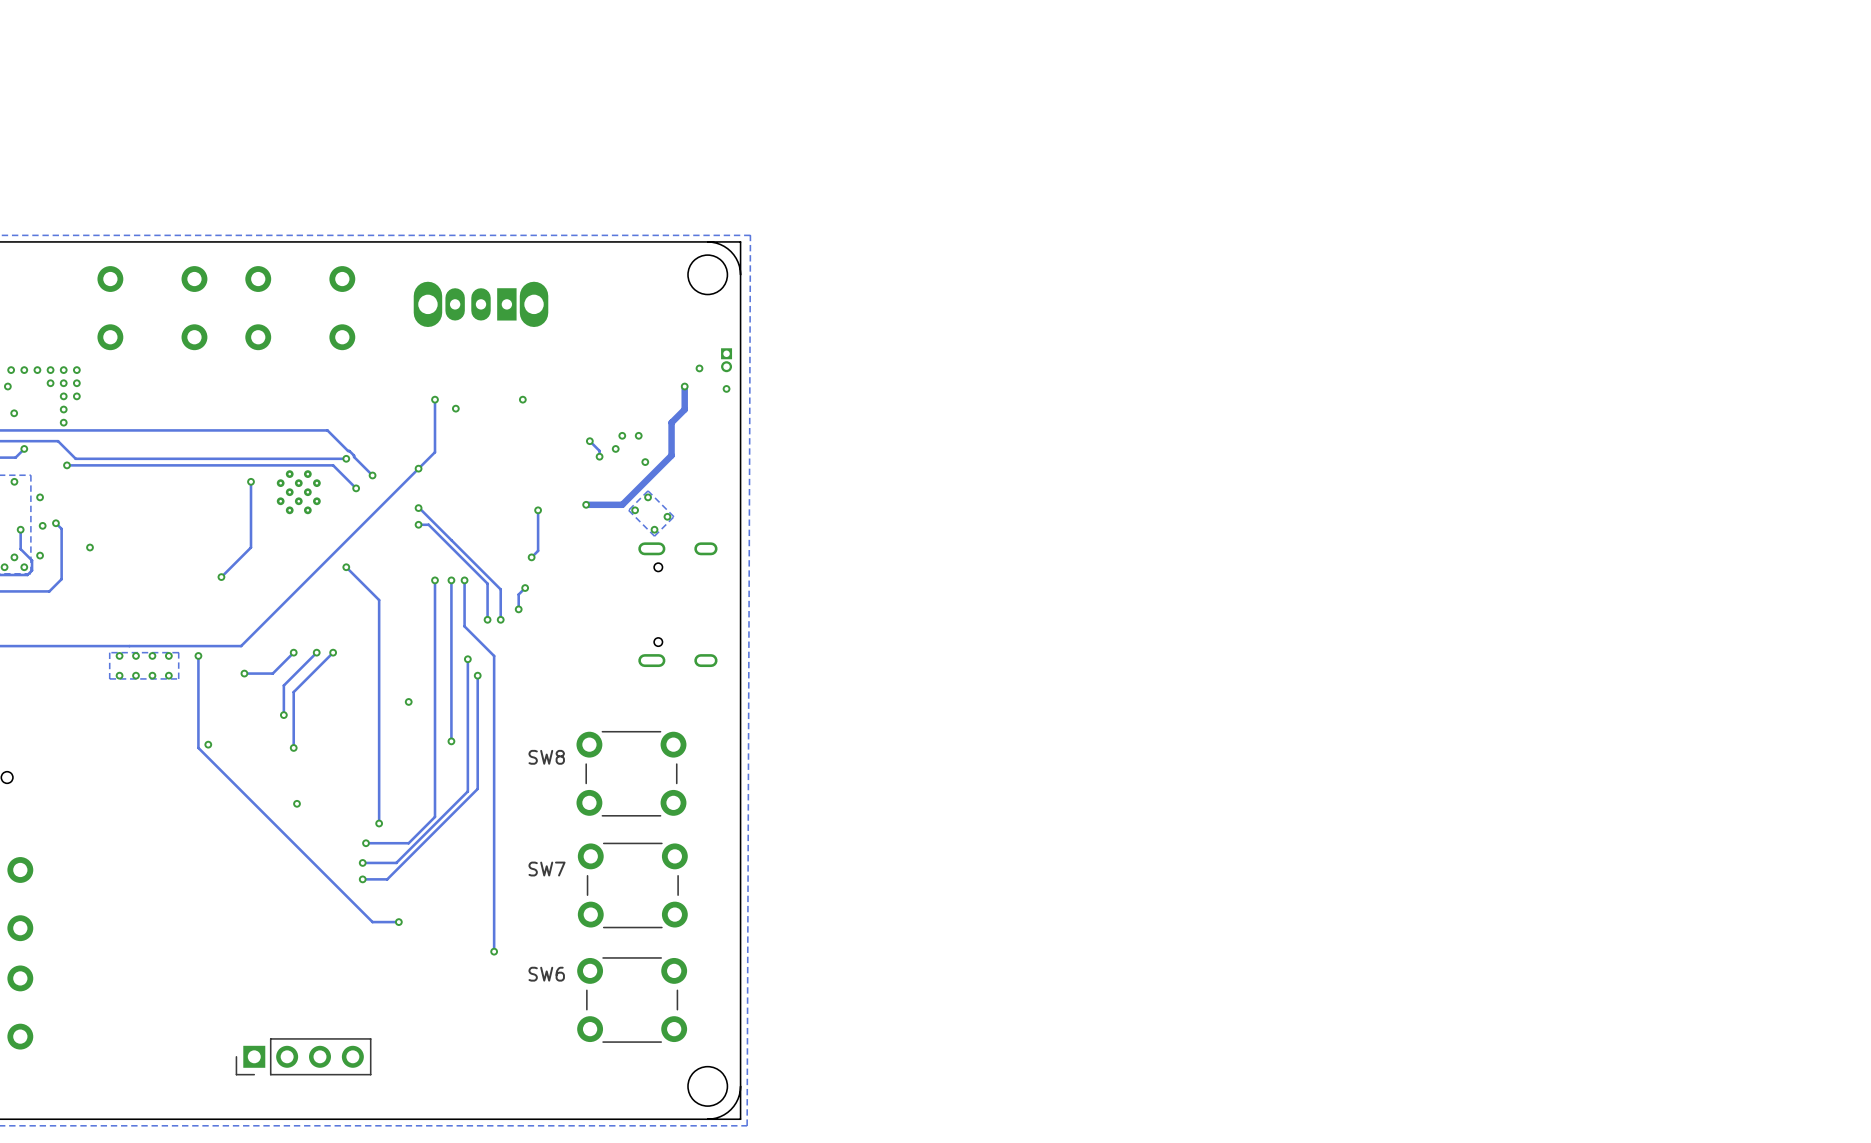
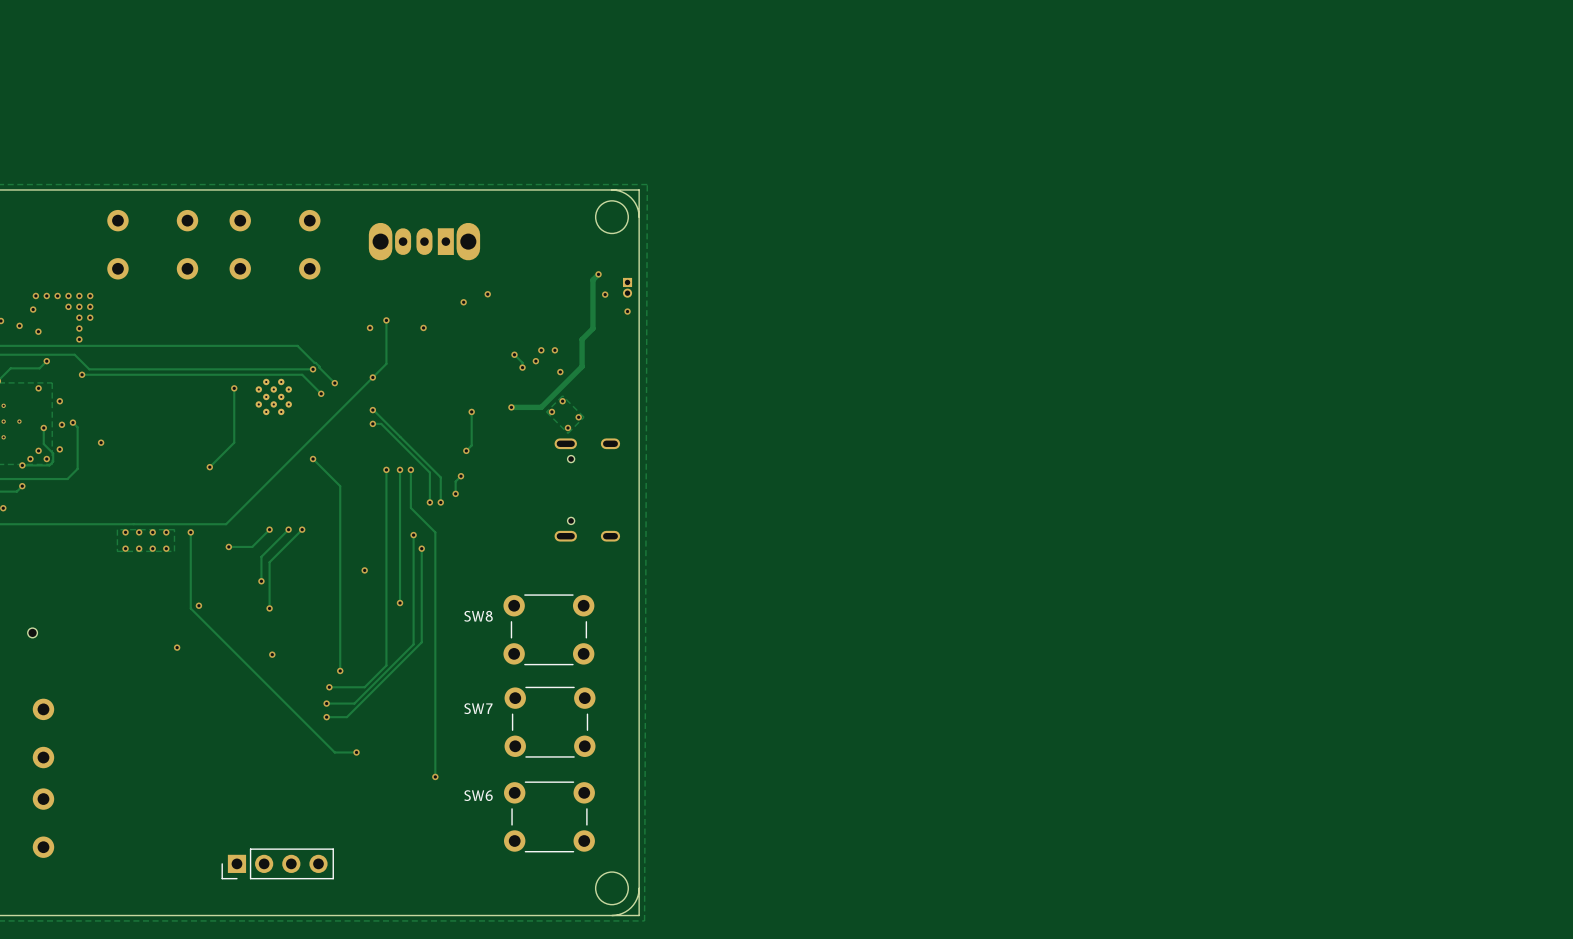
track: none -> (598, 274) (592, 279) (592, 309)
via: none -> (487, 294)
via: none -> (463, 302)
via position: (684, 386) -> (598, 274)
via: (522, 399) -> none
via: none -> (370, 327)
via: (455, 408) -> none
via: none -> (423, 327)
via: none -> (177, 647)

